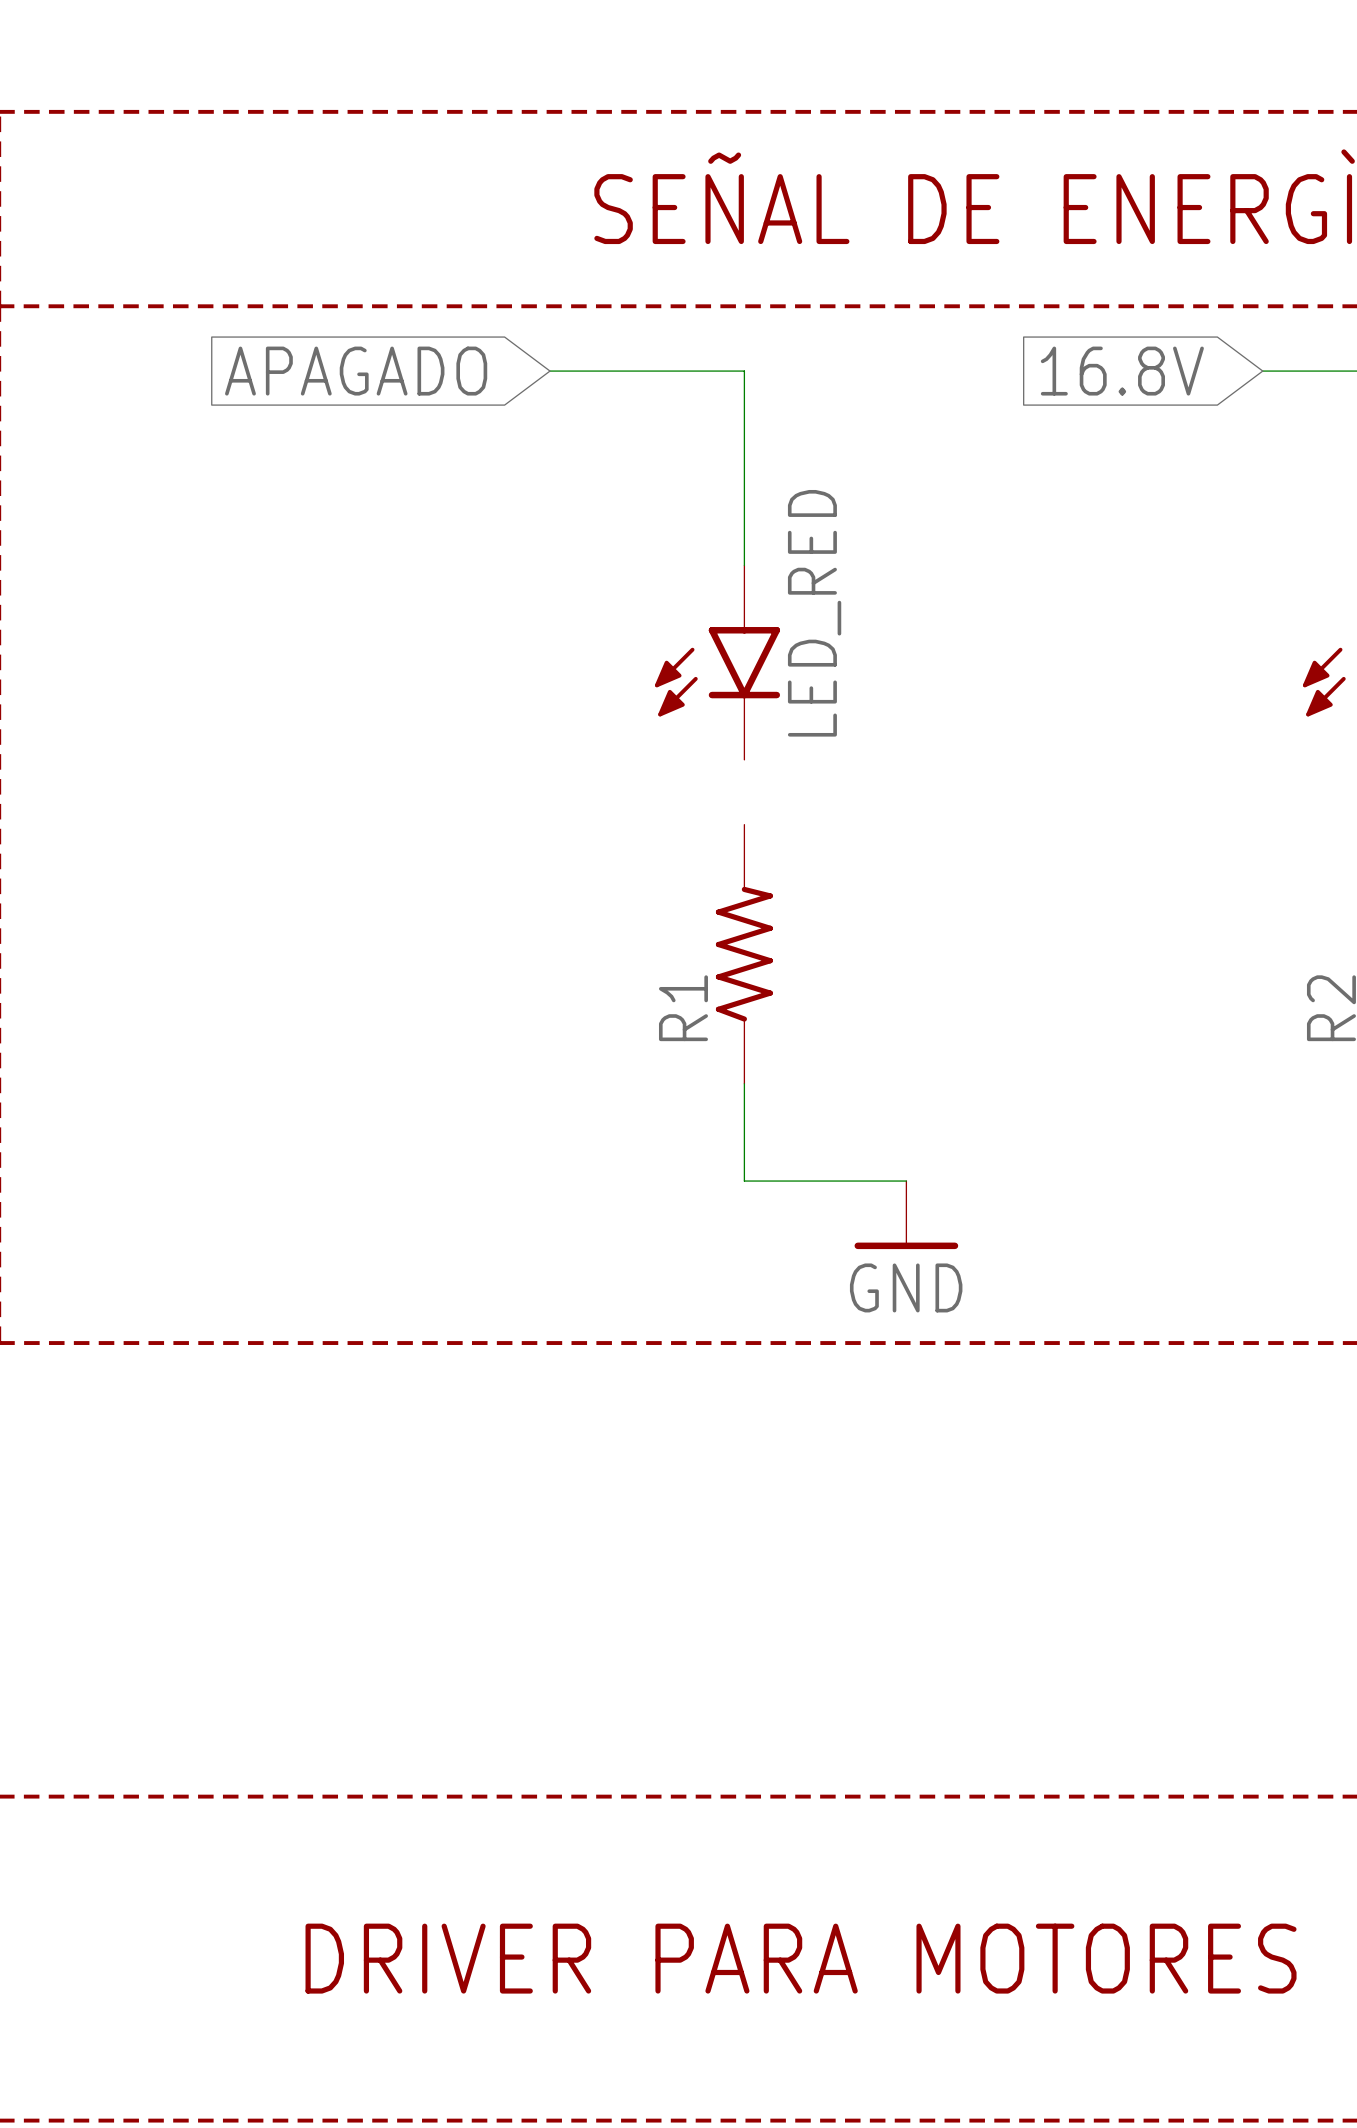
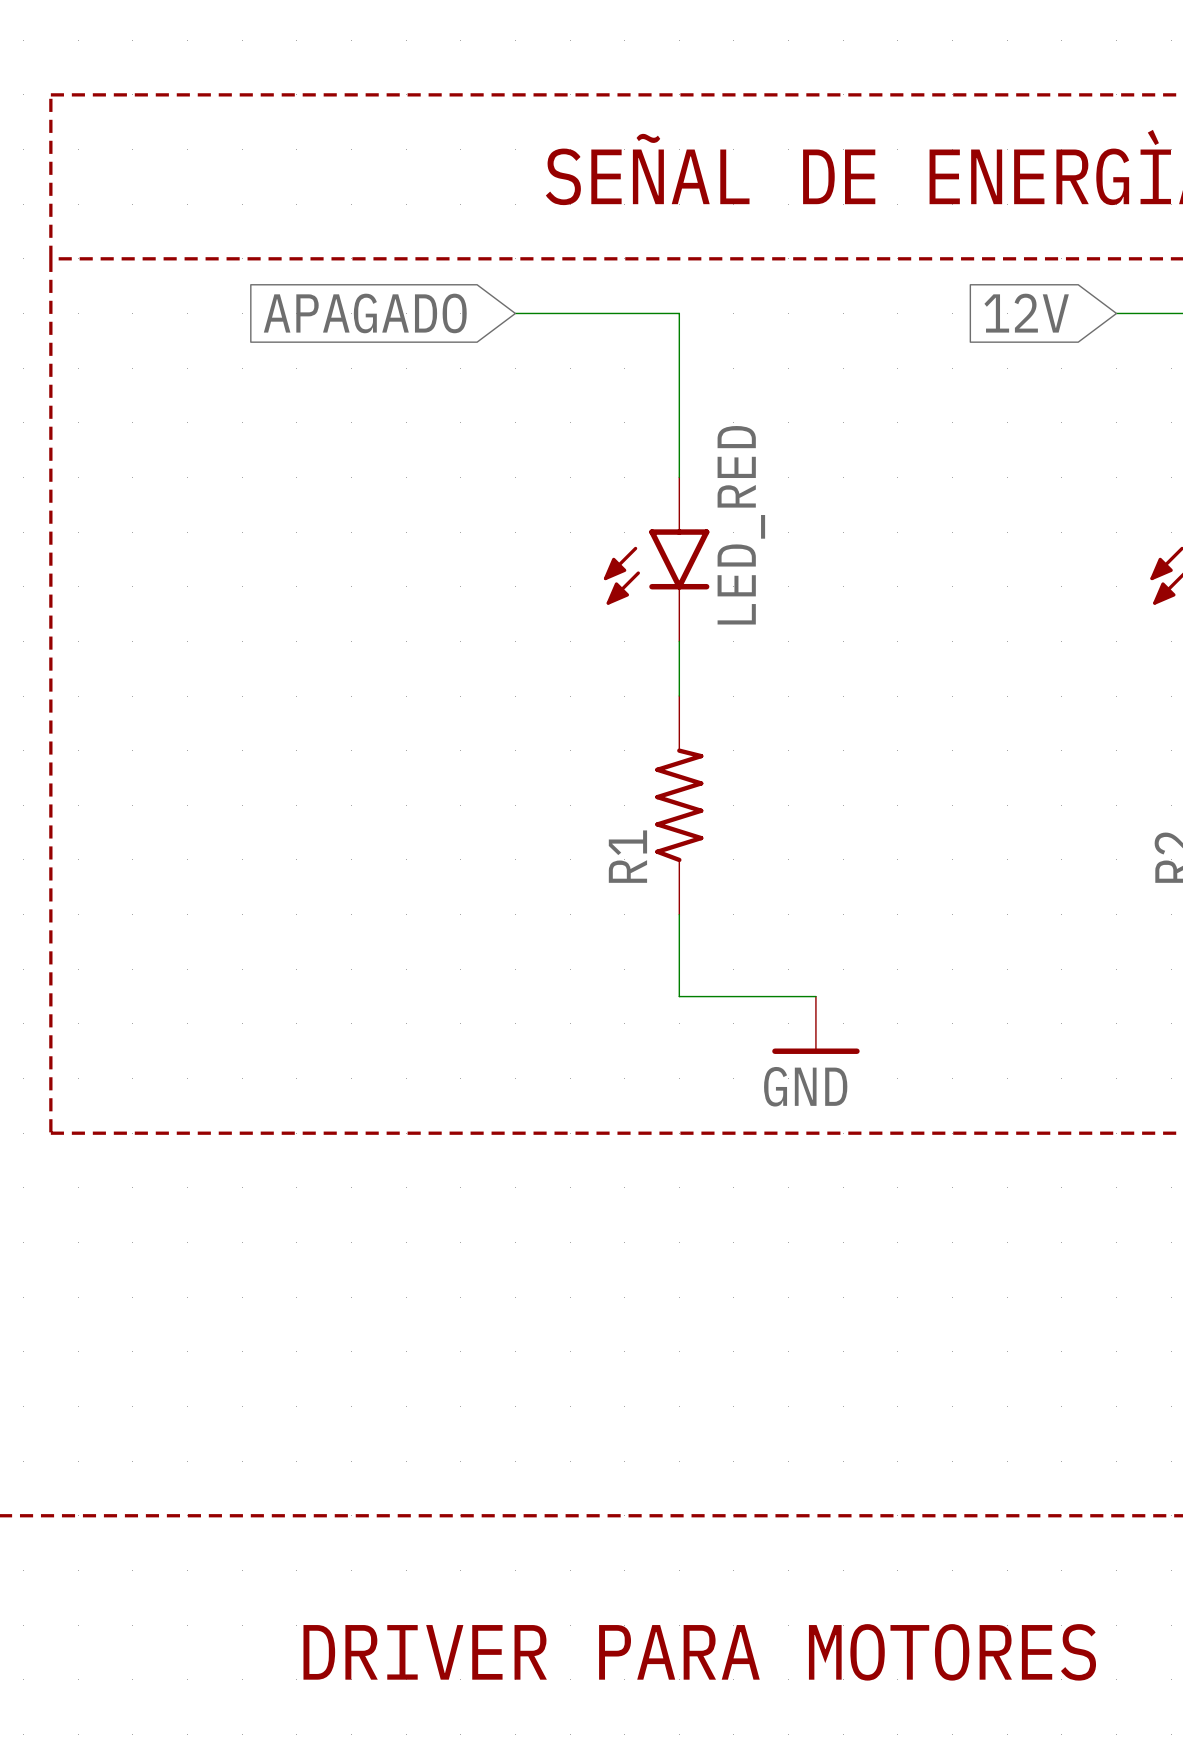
global label: 16.8V (1122, 371) -> 12V (1026, 313)
wire: none -> (679, 641) (679, 696)

